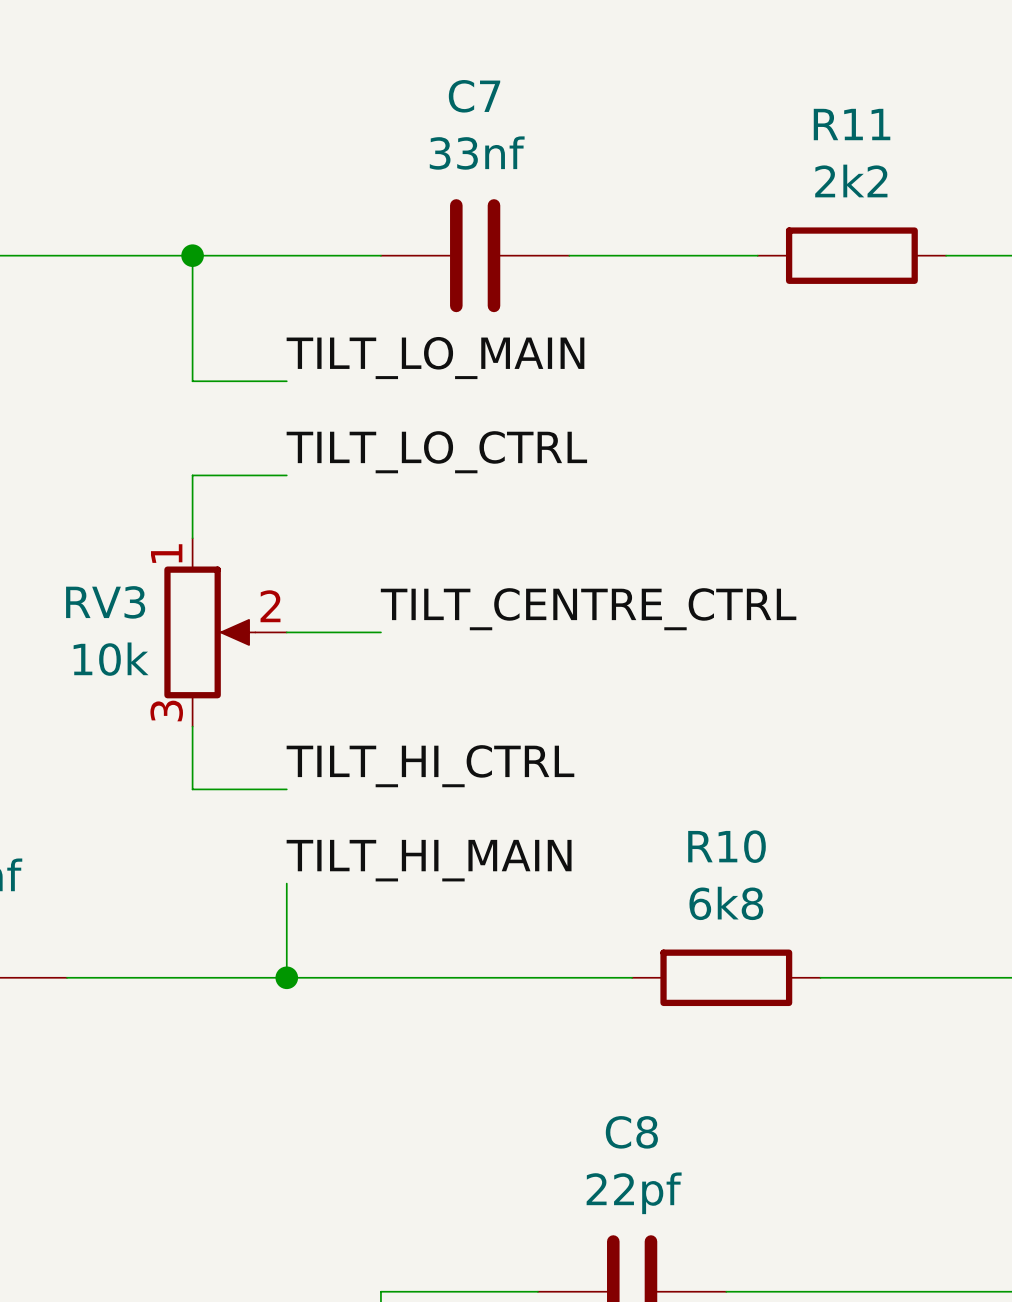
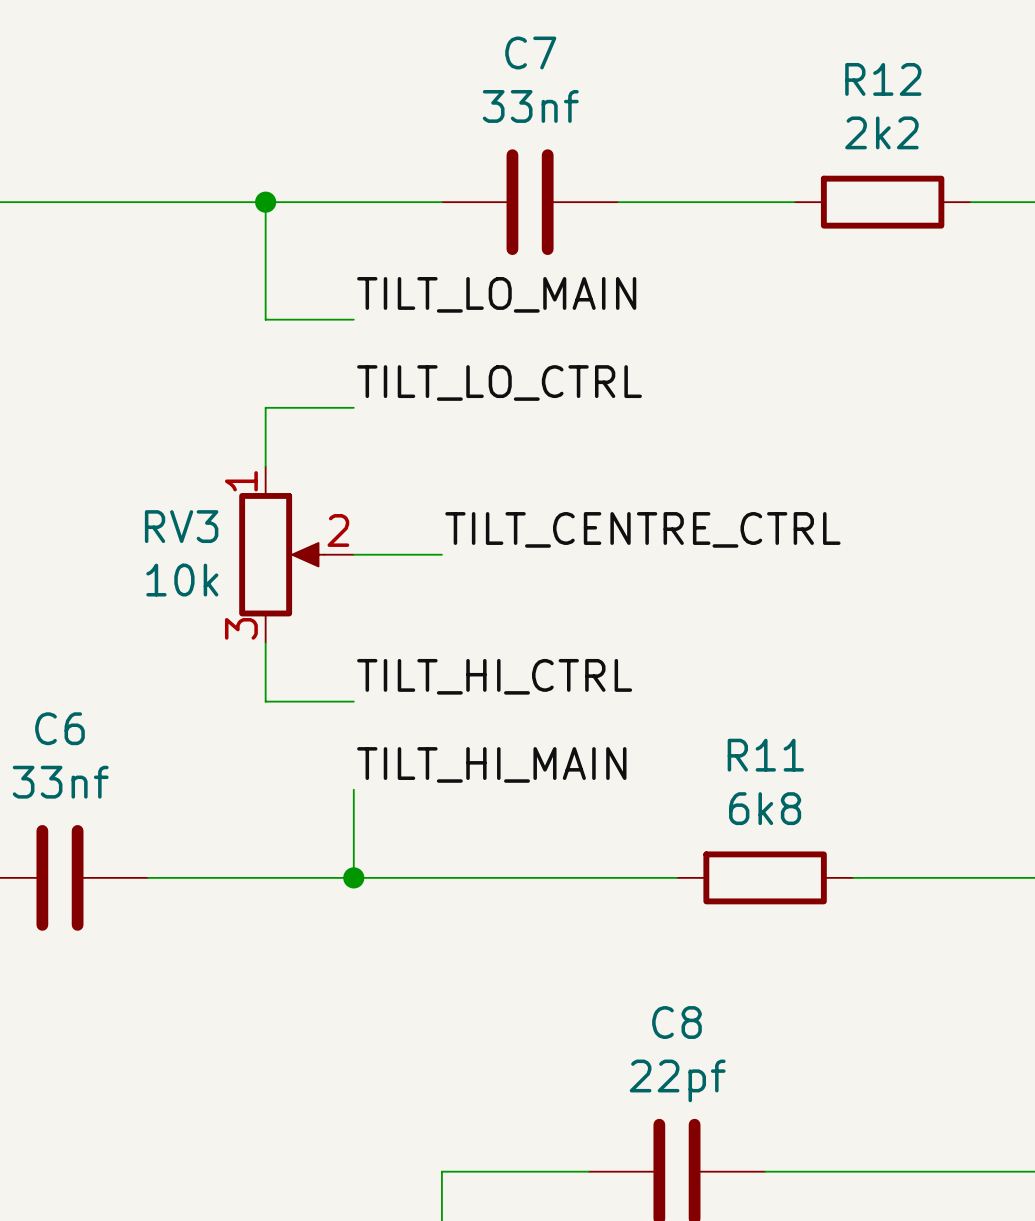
R11 name: R11 (852, 124) -> R12 (883, 79)
R10 name: R10 (727, 846) -> R11 (765, 755)

